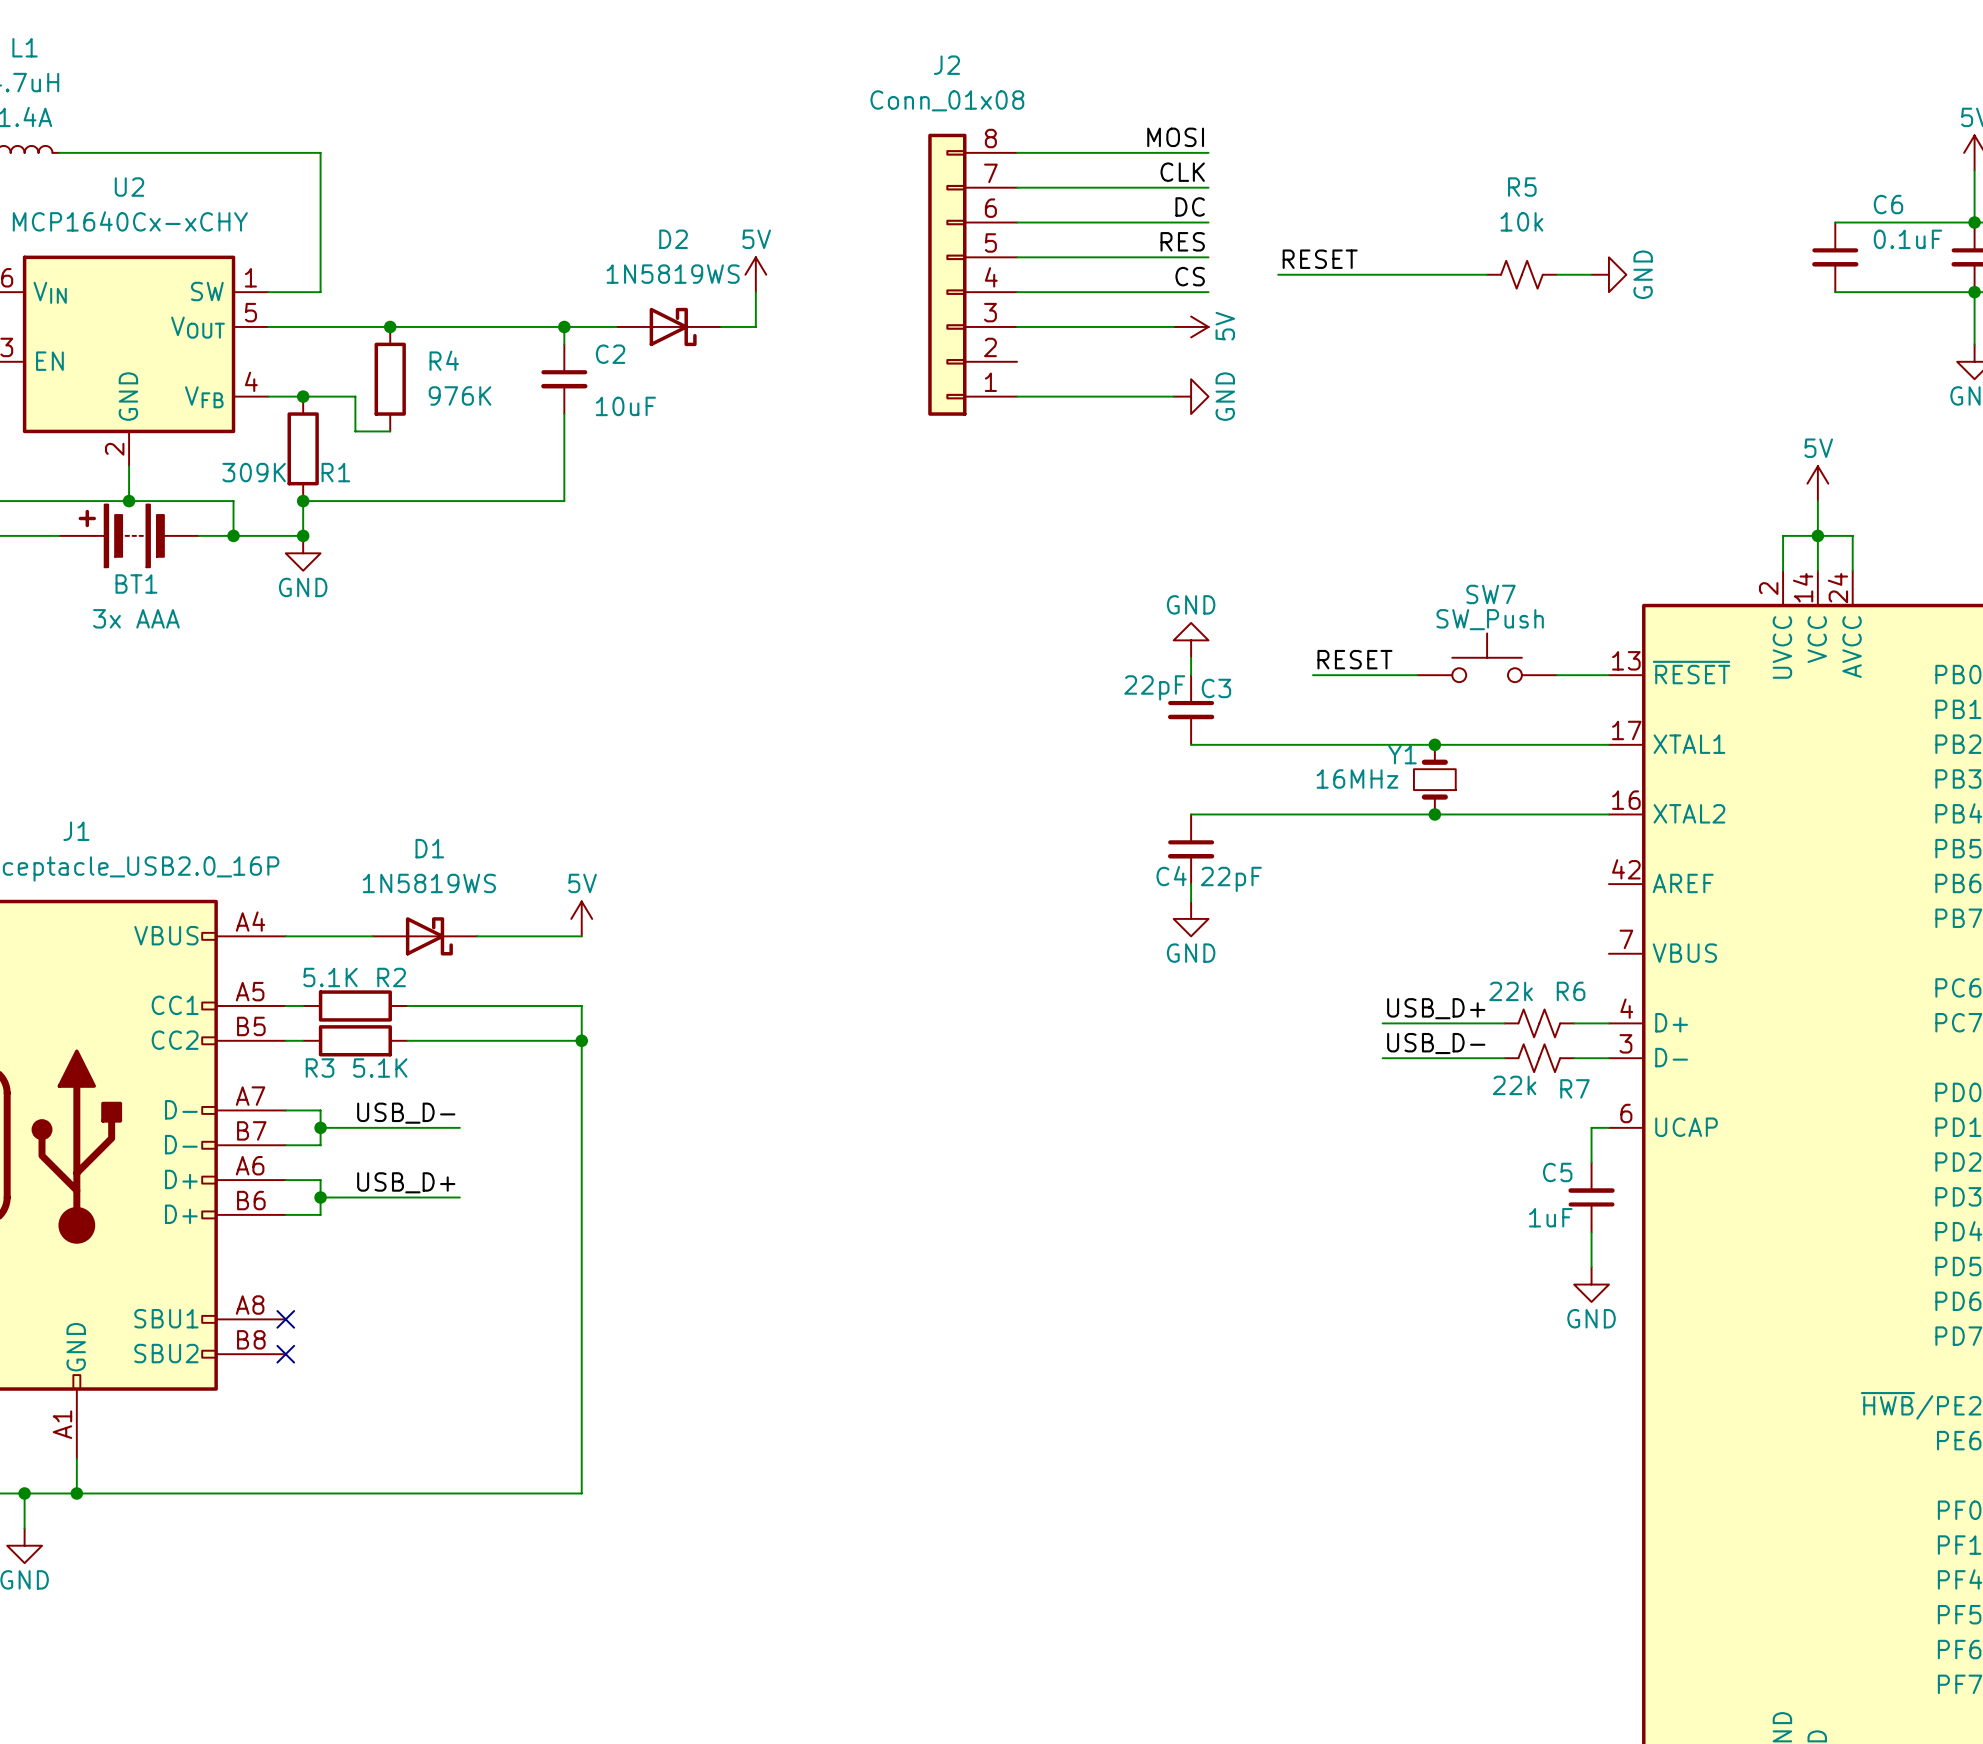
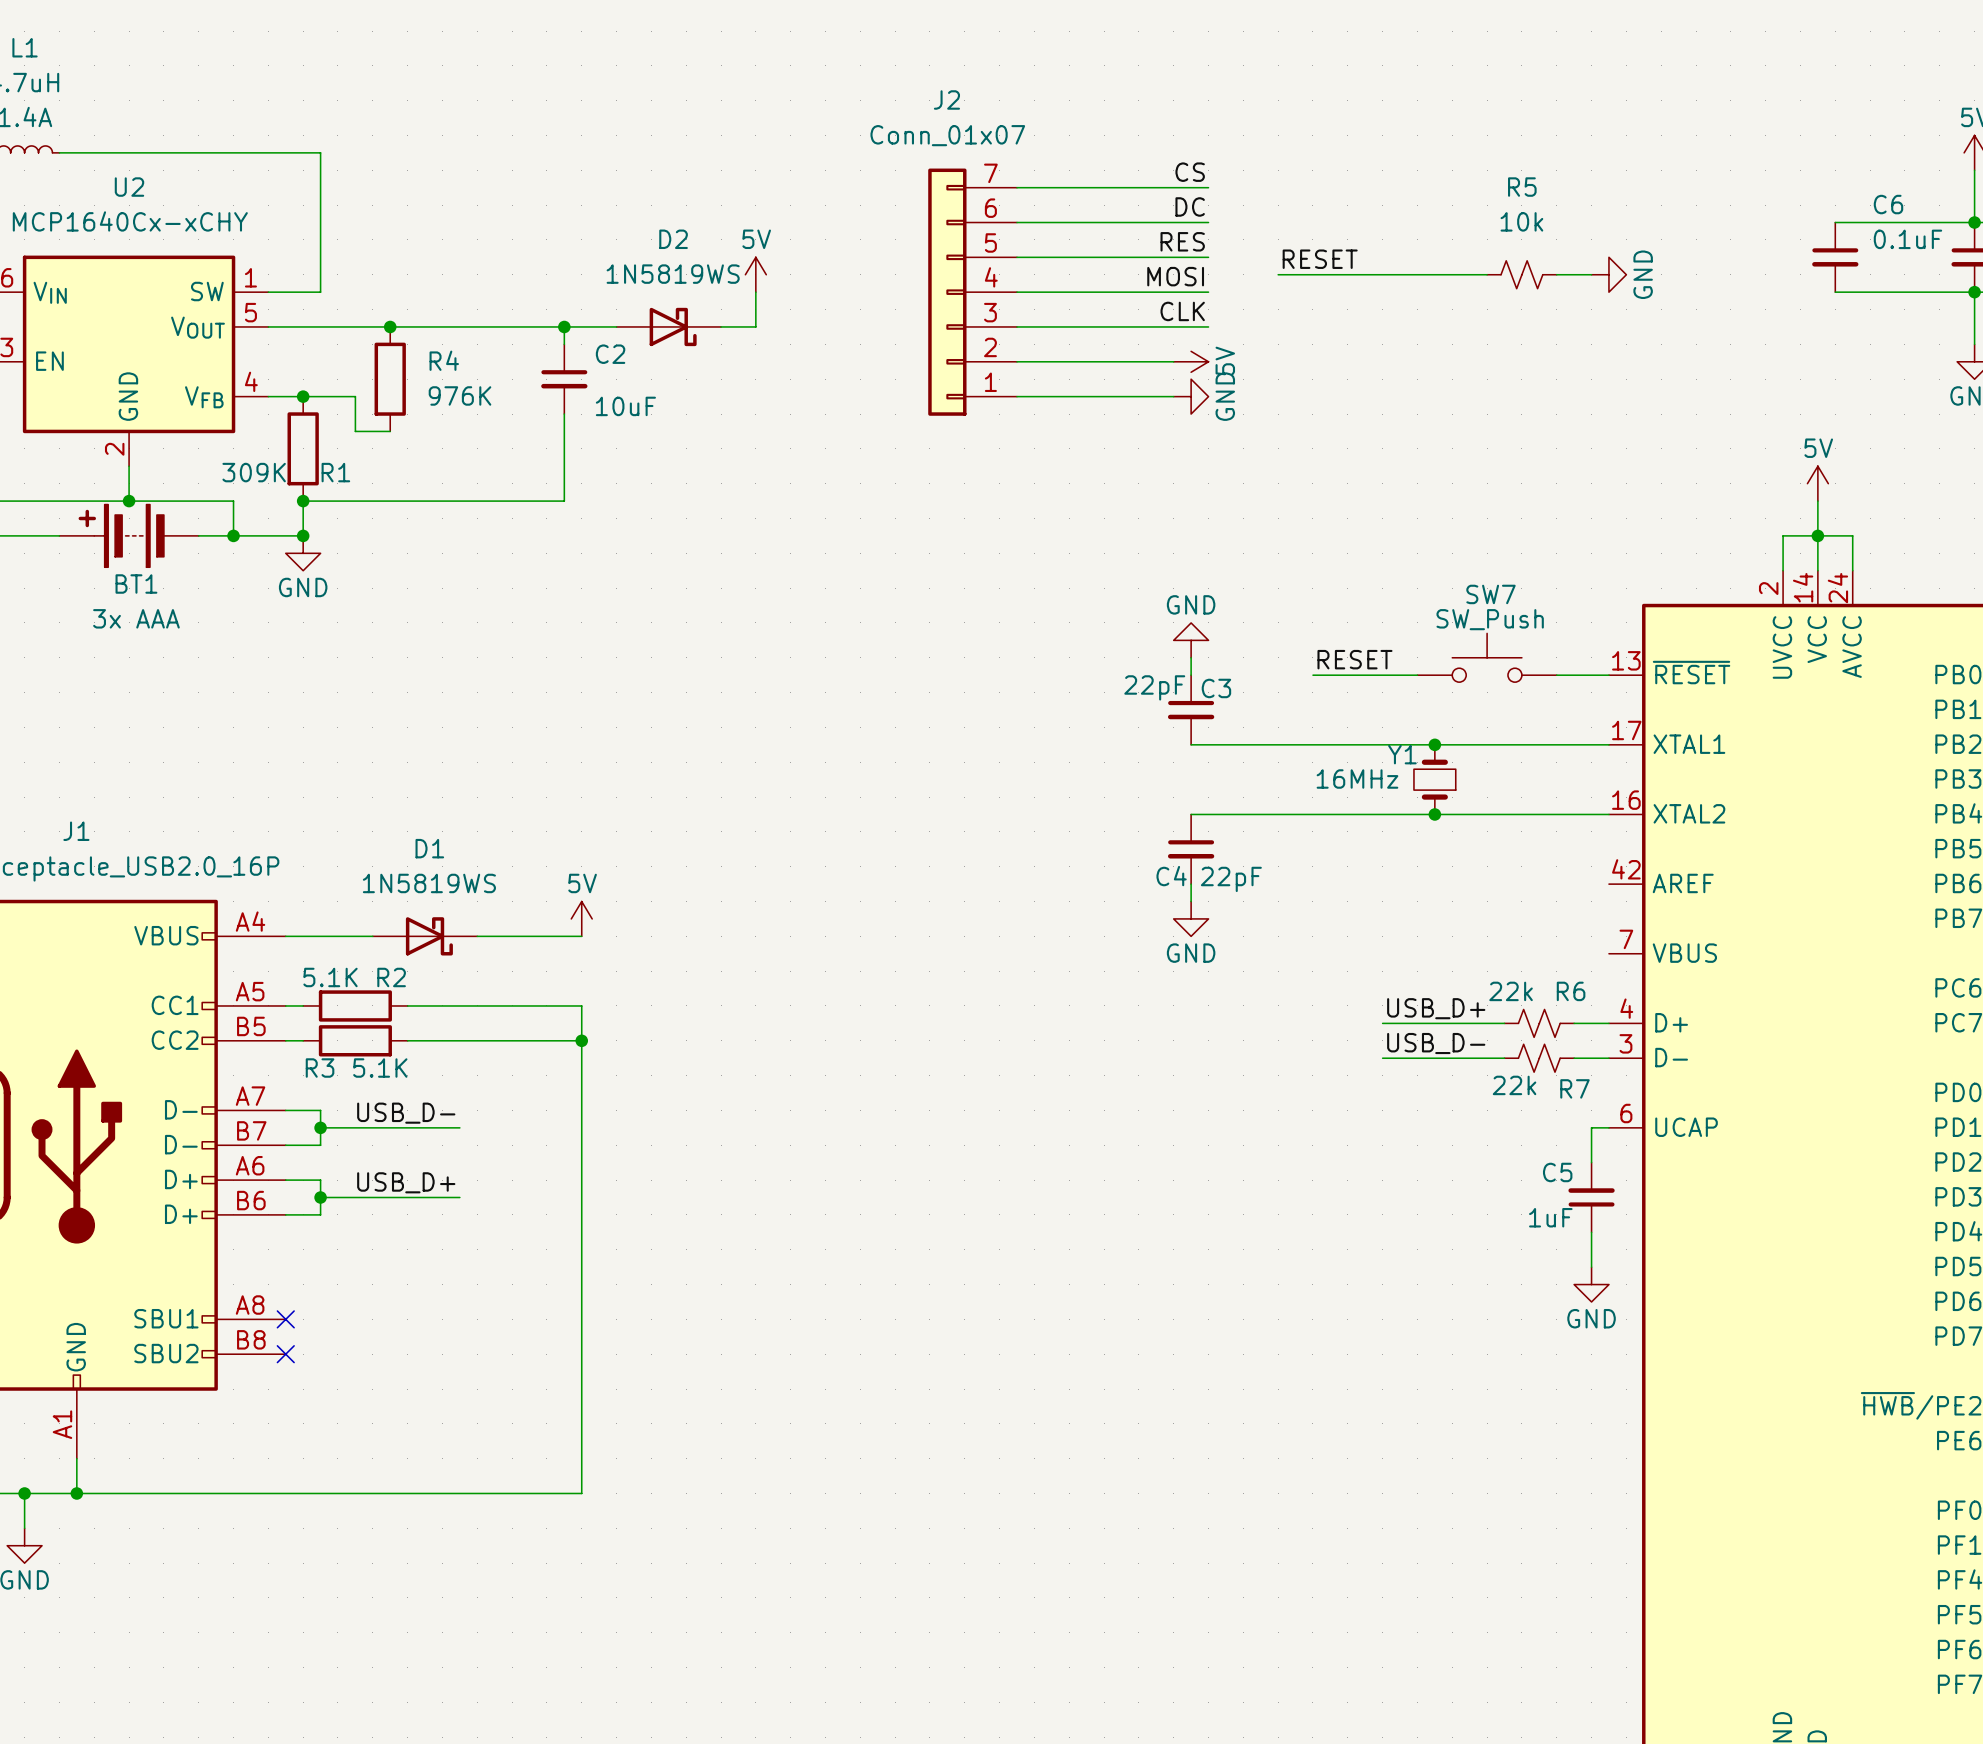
J2 value: Conn_01x08 (947, 100) -> Conn_01x07 (947, 135)
J2 symbol: [928, 133, 1018, 416] -> [928, 168, 1018, 416]
label: MOSI (1175, 137) -> none
wire: (1017, 152) (1208, 152) -> none
label: CLK (1182, 172) -> CS (1190, 172)
label: CS (1190, 276) -> MOSI (1175, 276)
label: none -> CLK (1182, 311)
power symbol position: 5V (1191, 326) -> 5V (1191, 361)
wire: none -> (1017, 361) (1173, 361)

